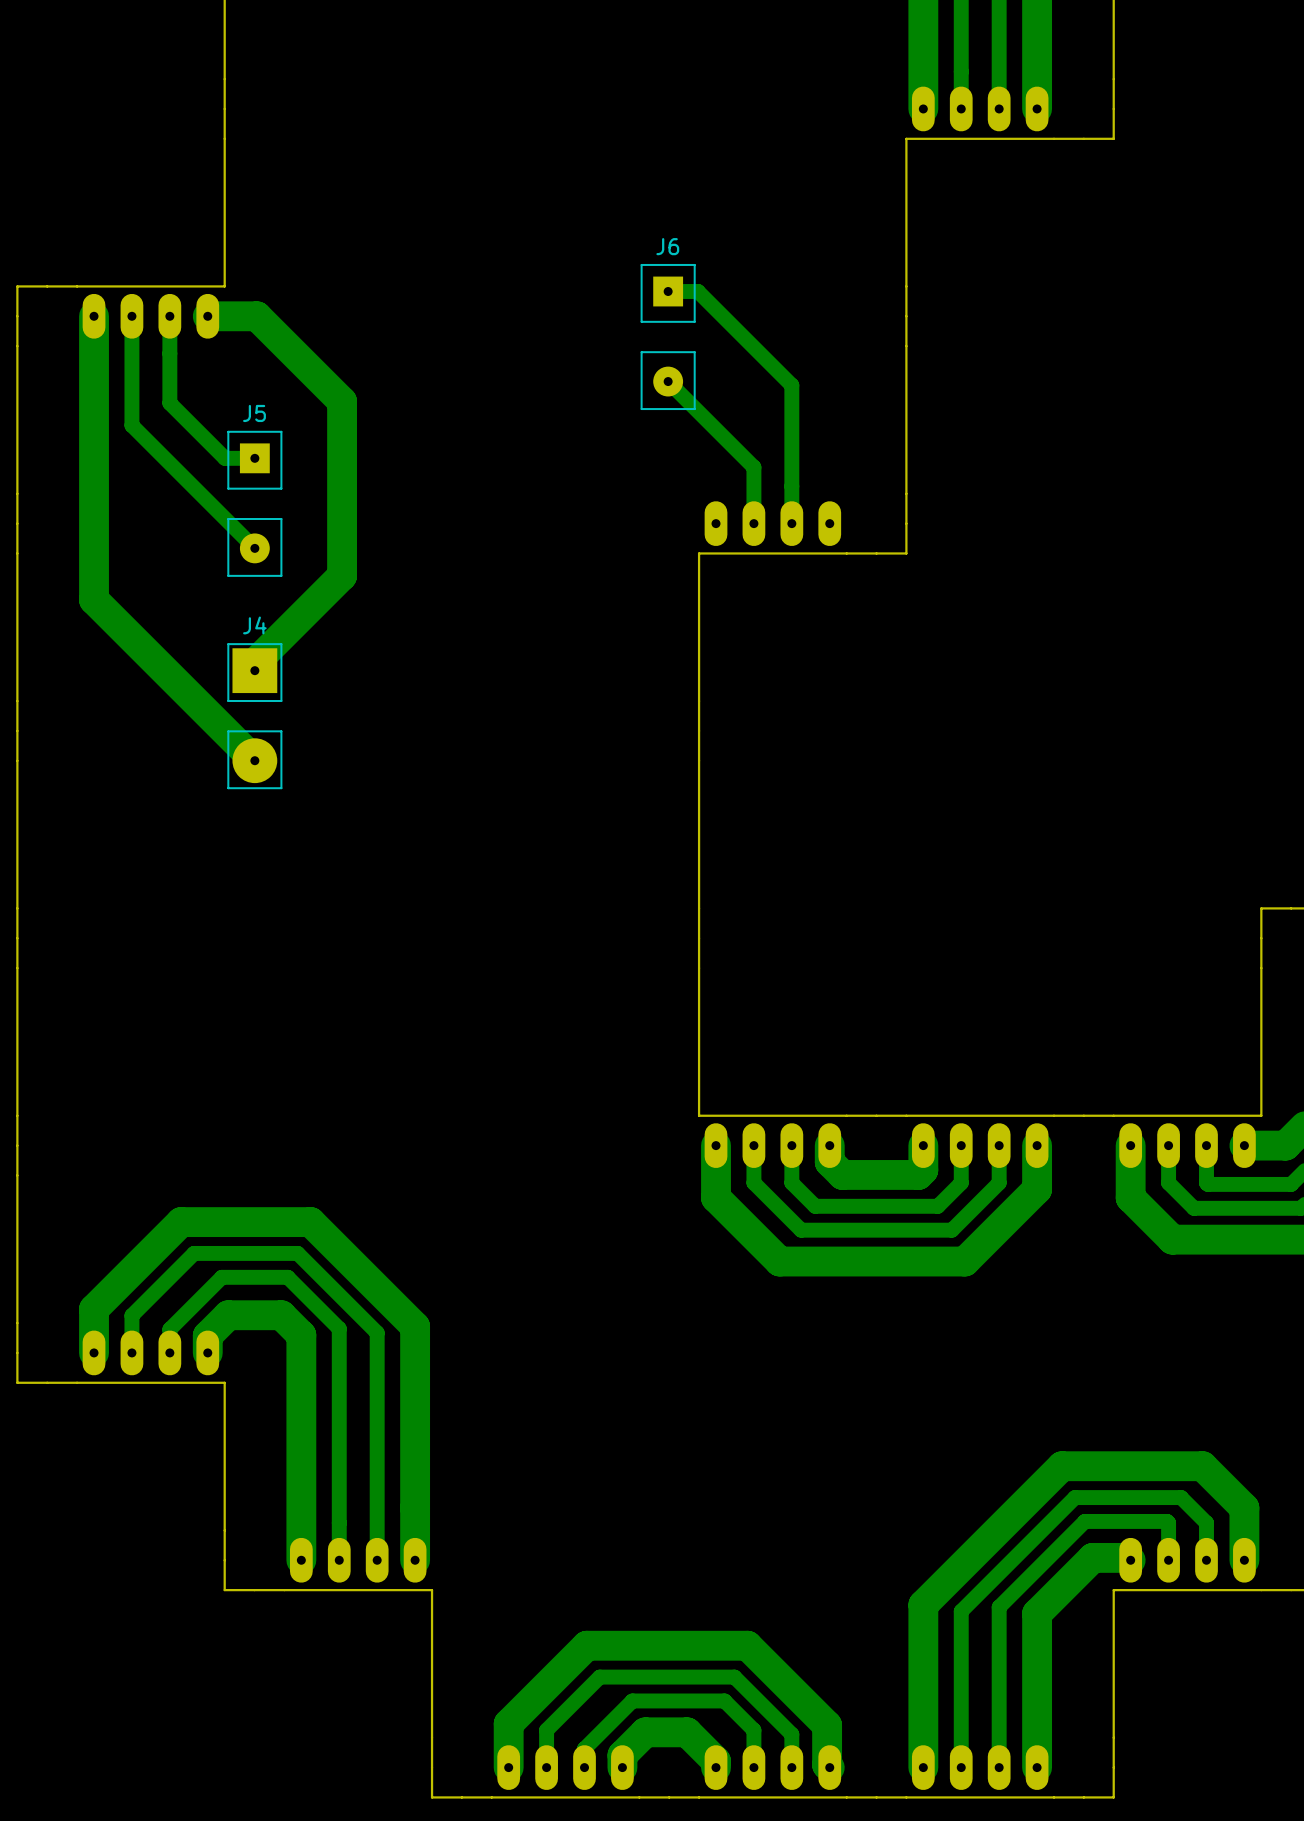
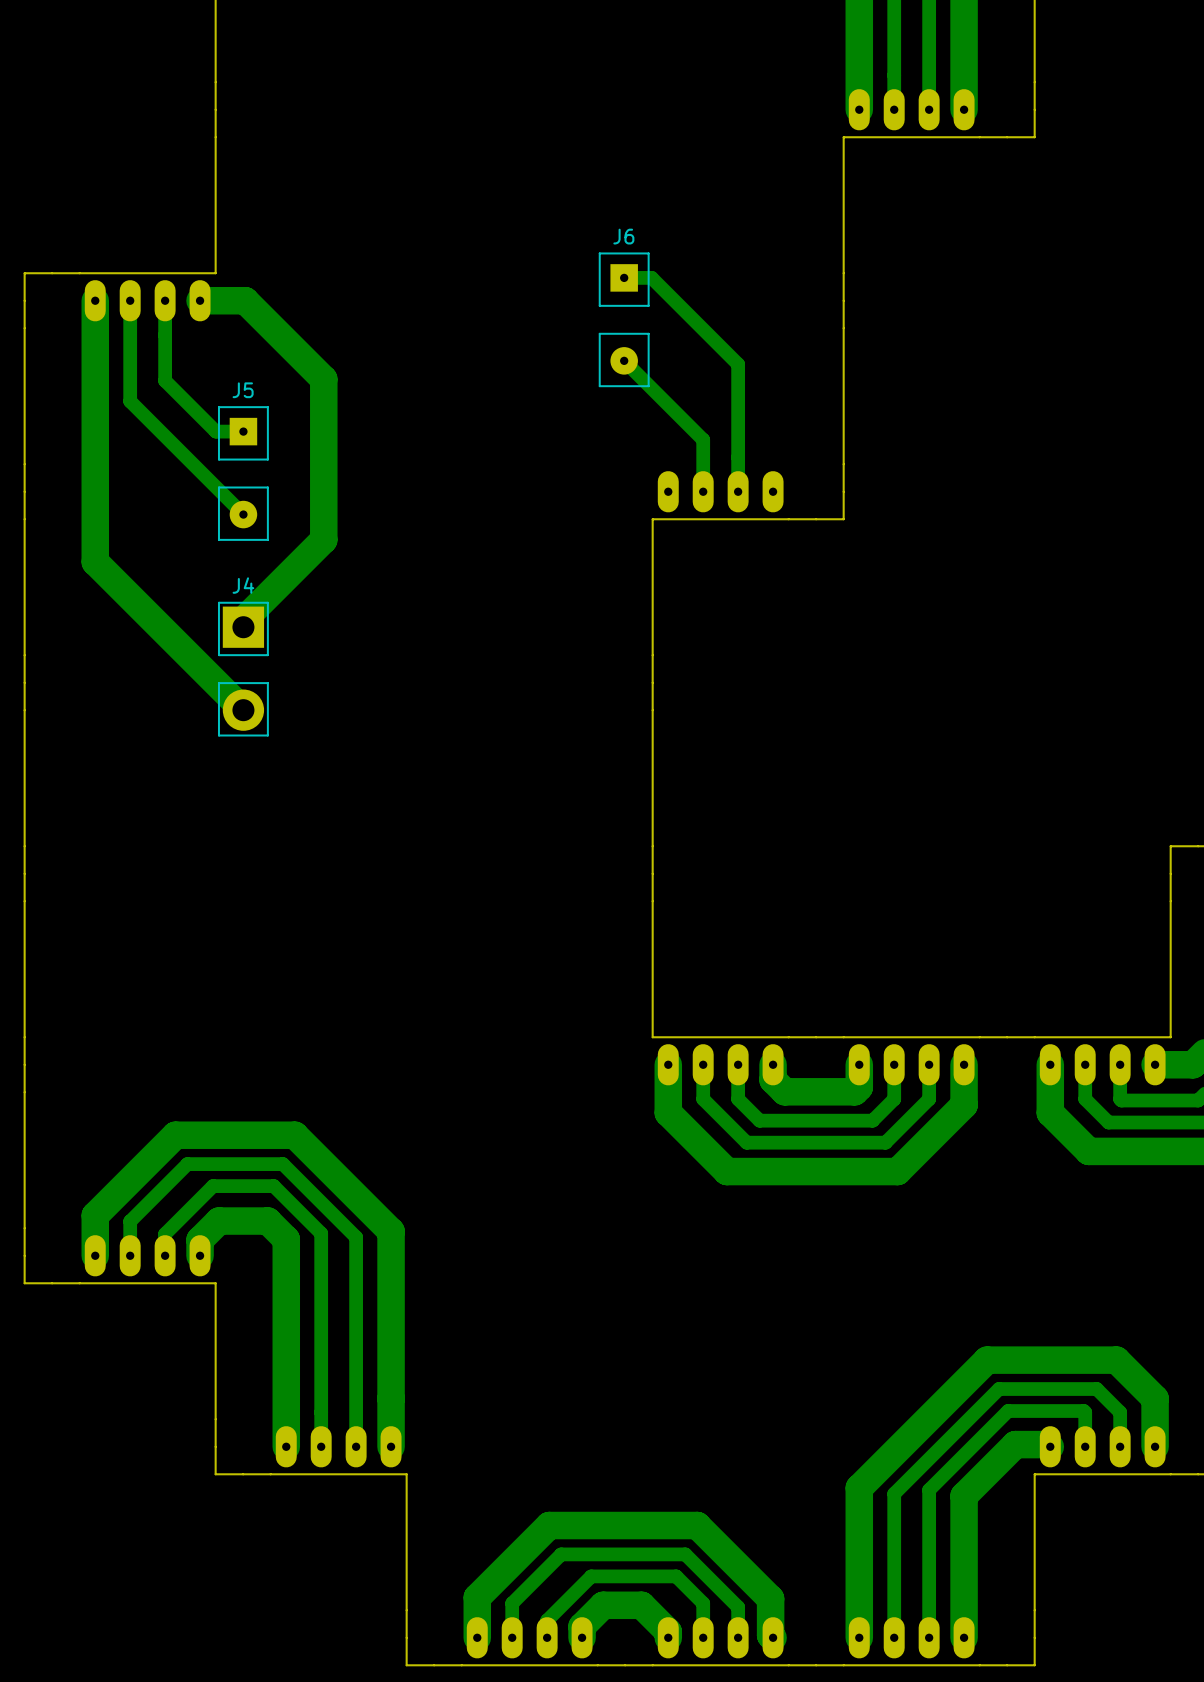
J4 footprint: [227, 643, 283, 790] -> [218, 601, 269, 737]

